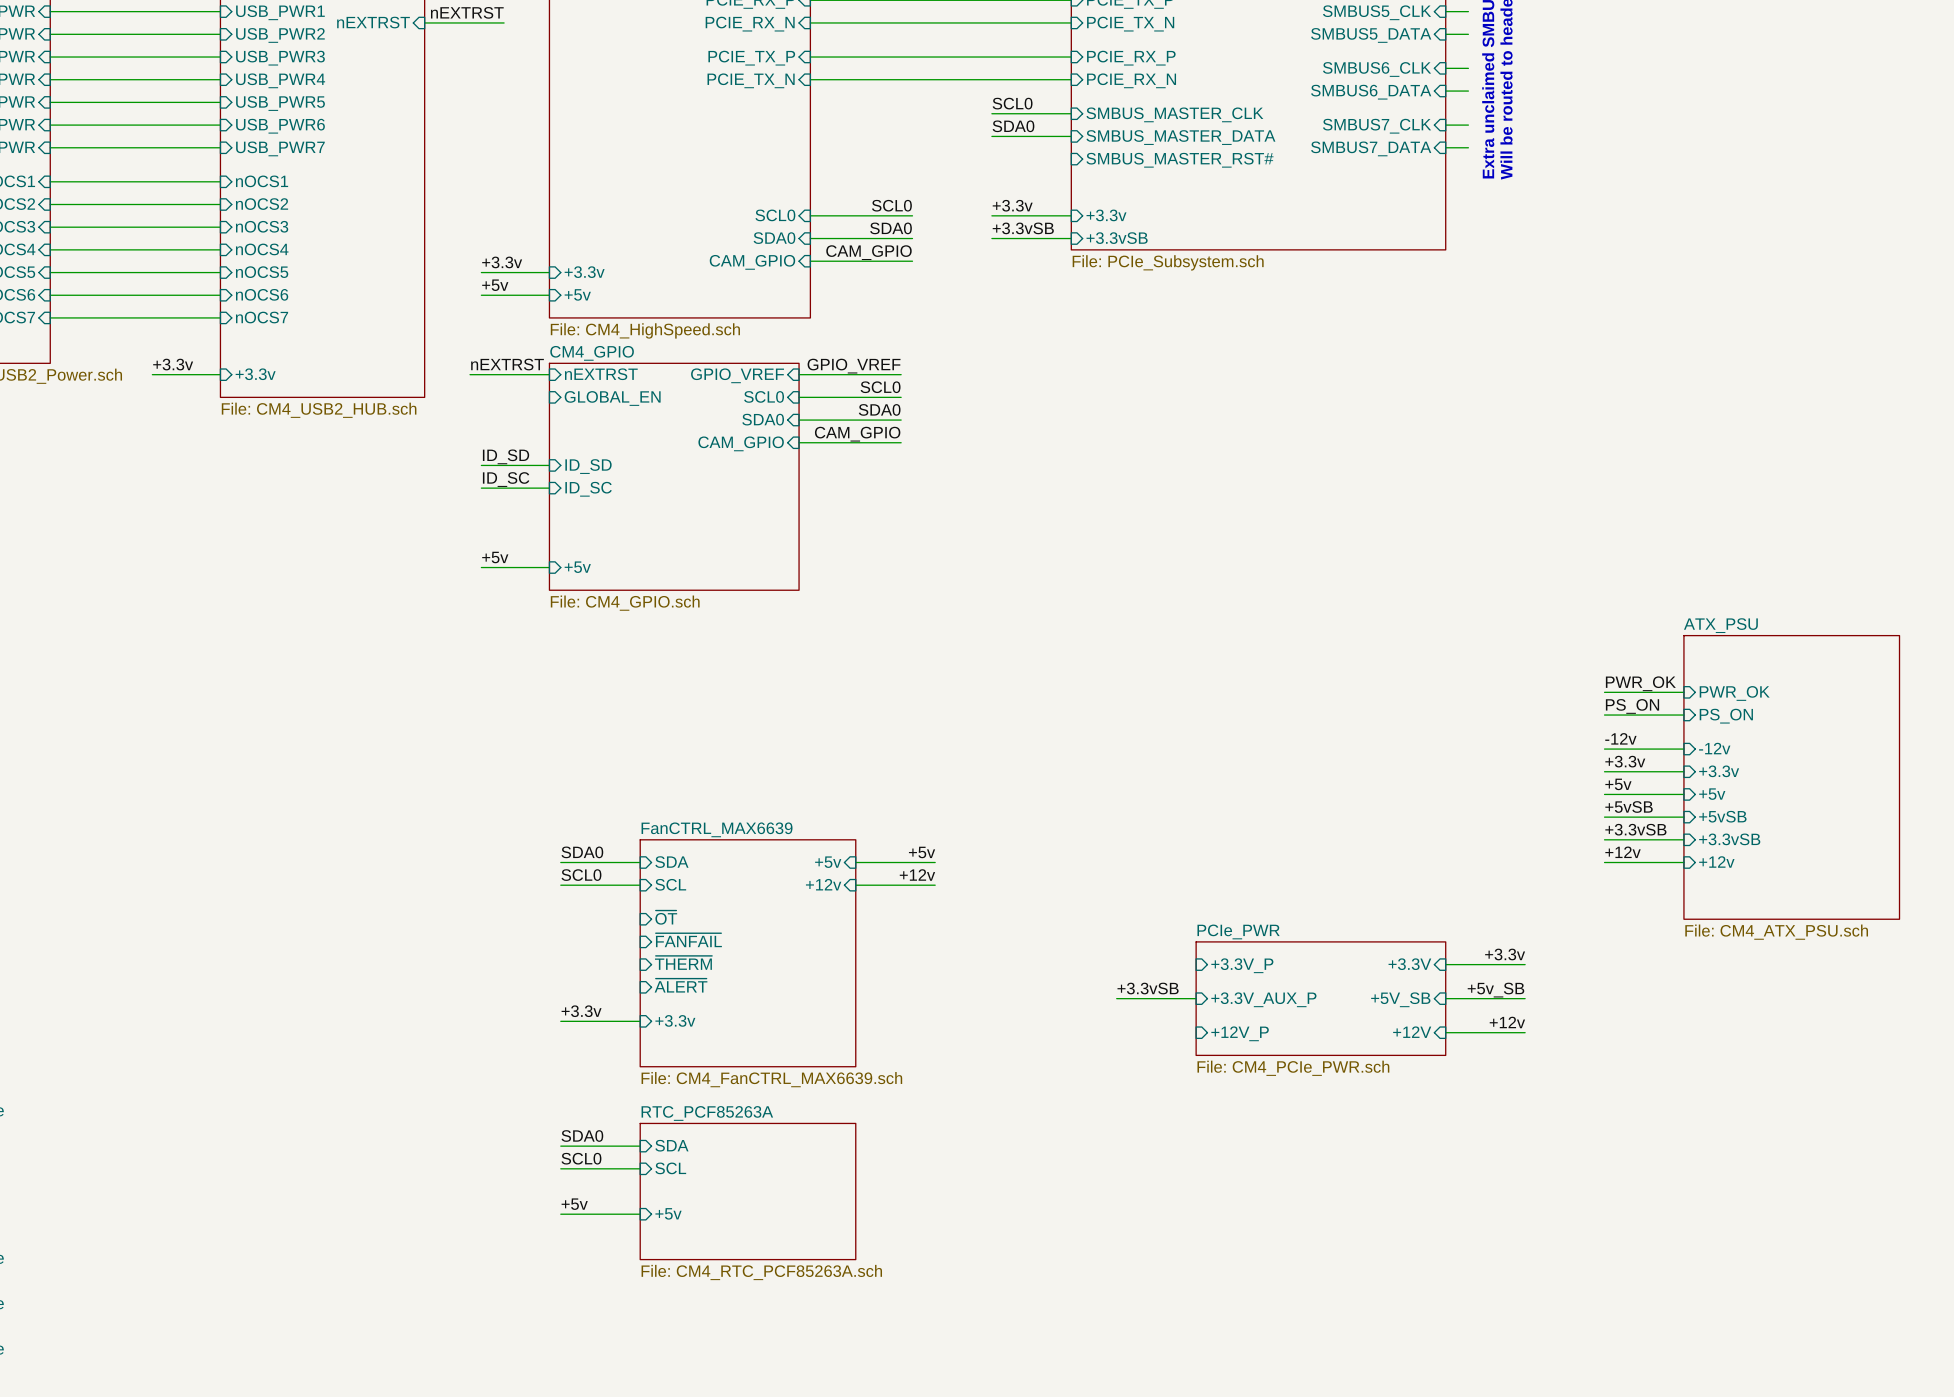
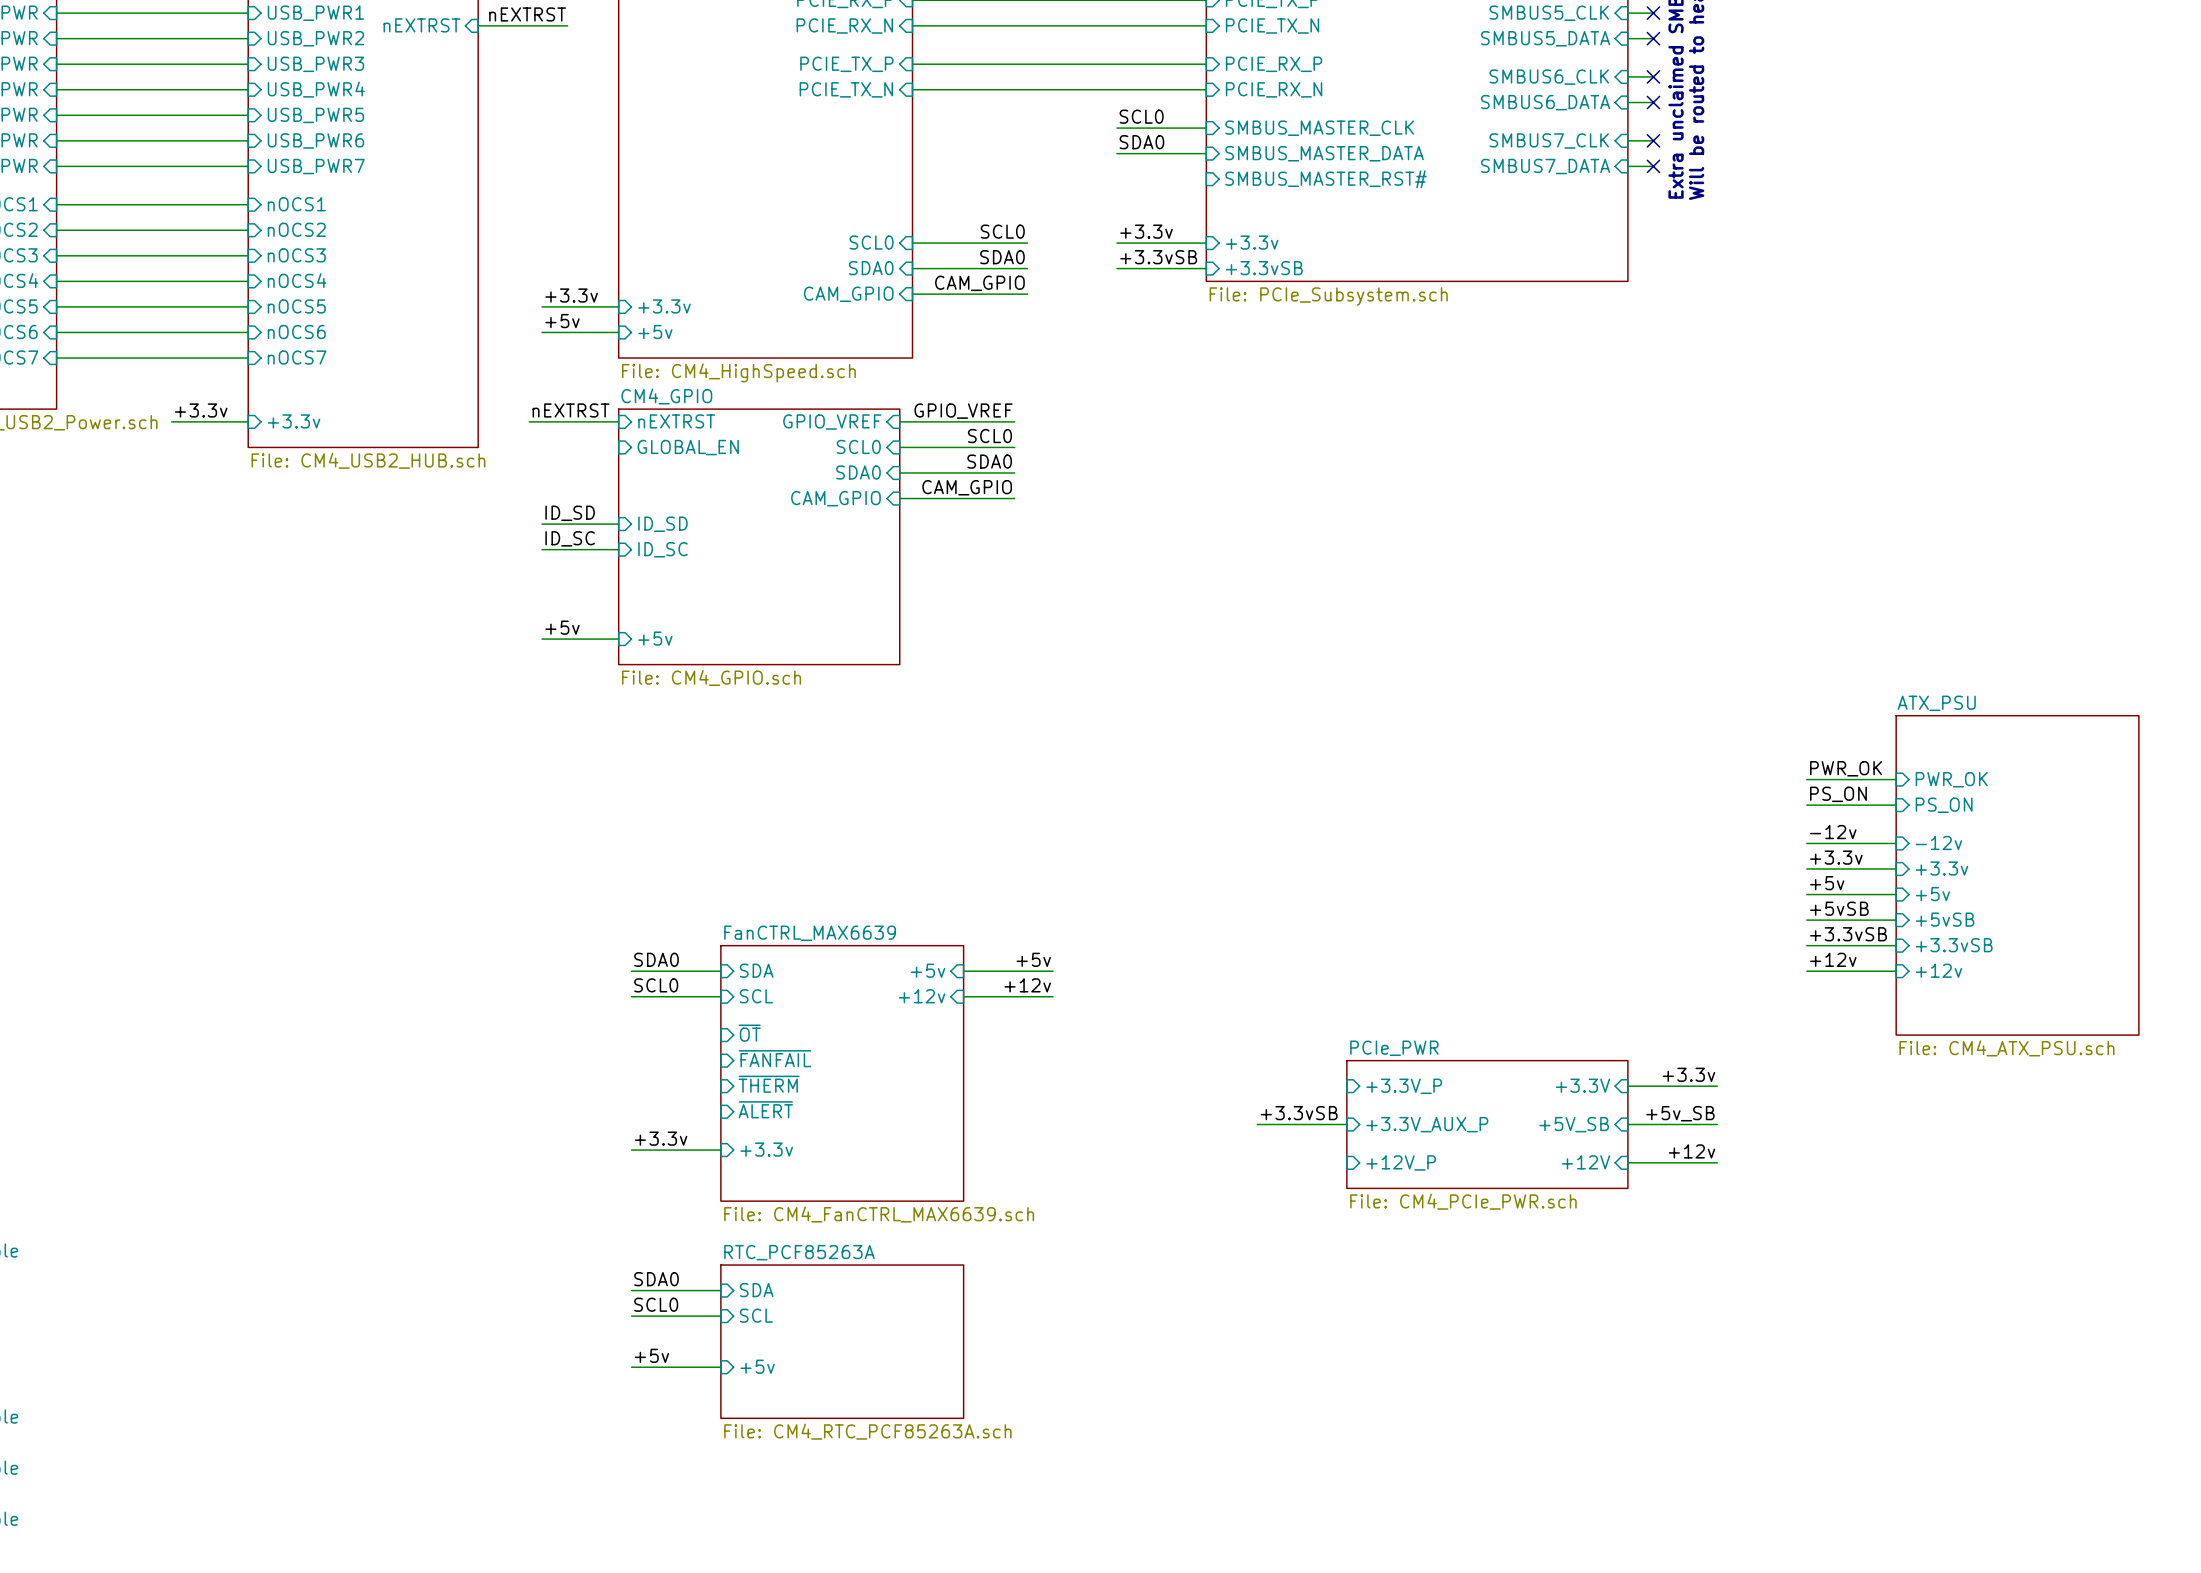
no-connect mark: none -> (1653, 13)
no-connect mark: none -> (1653, 38)
no-connect mark: none -> (1653, 76)
no-connect mark: none -> (1653, 102)
no-connect mark: none -> (1653, 140)
no-connect mark: none -> (1653, 166)

